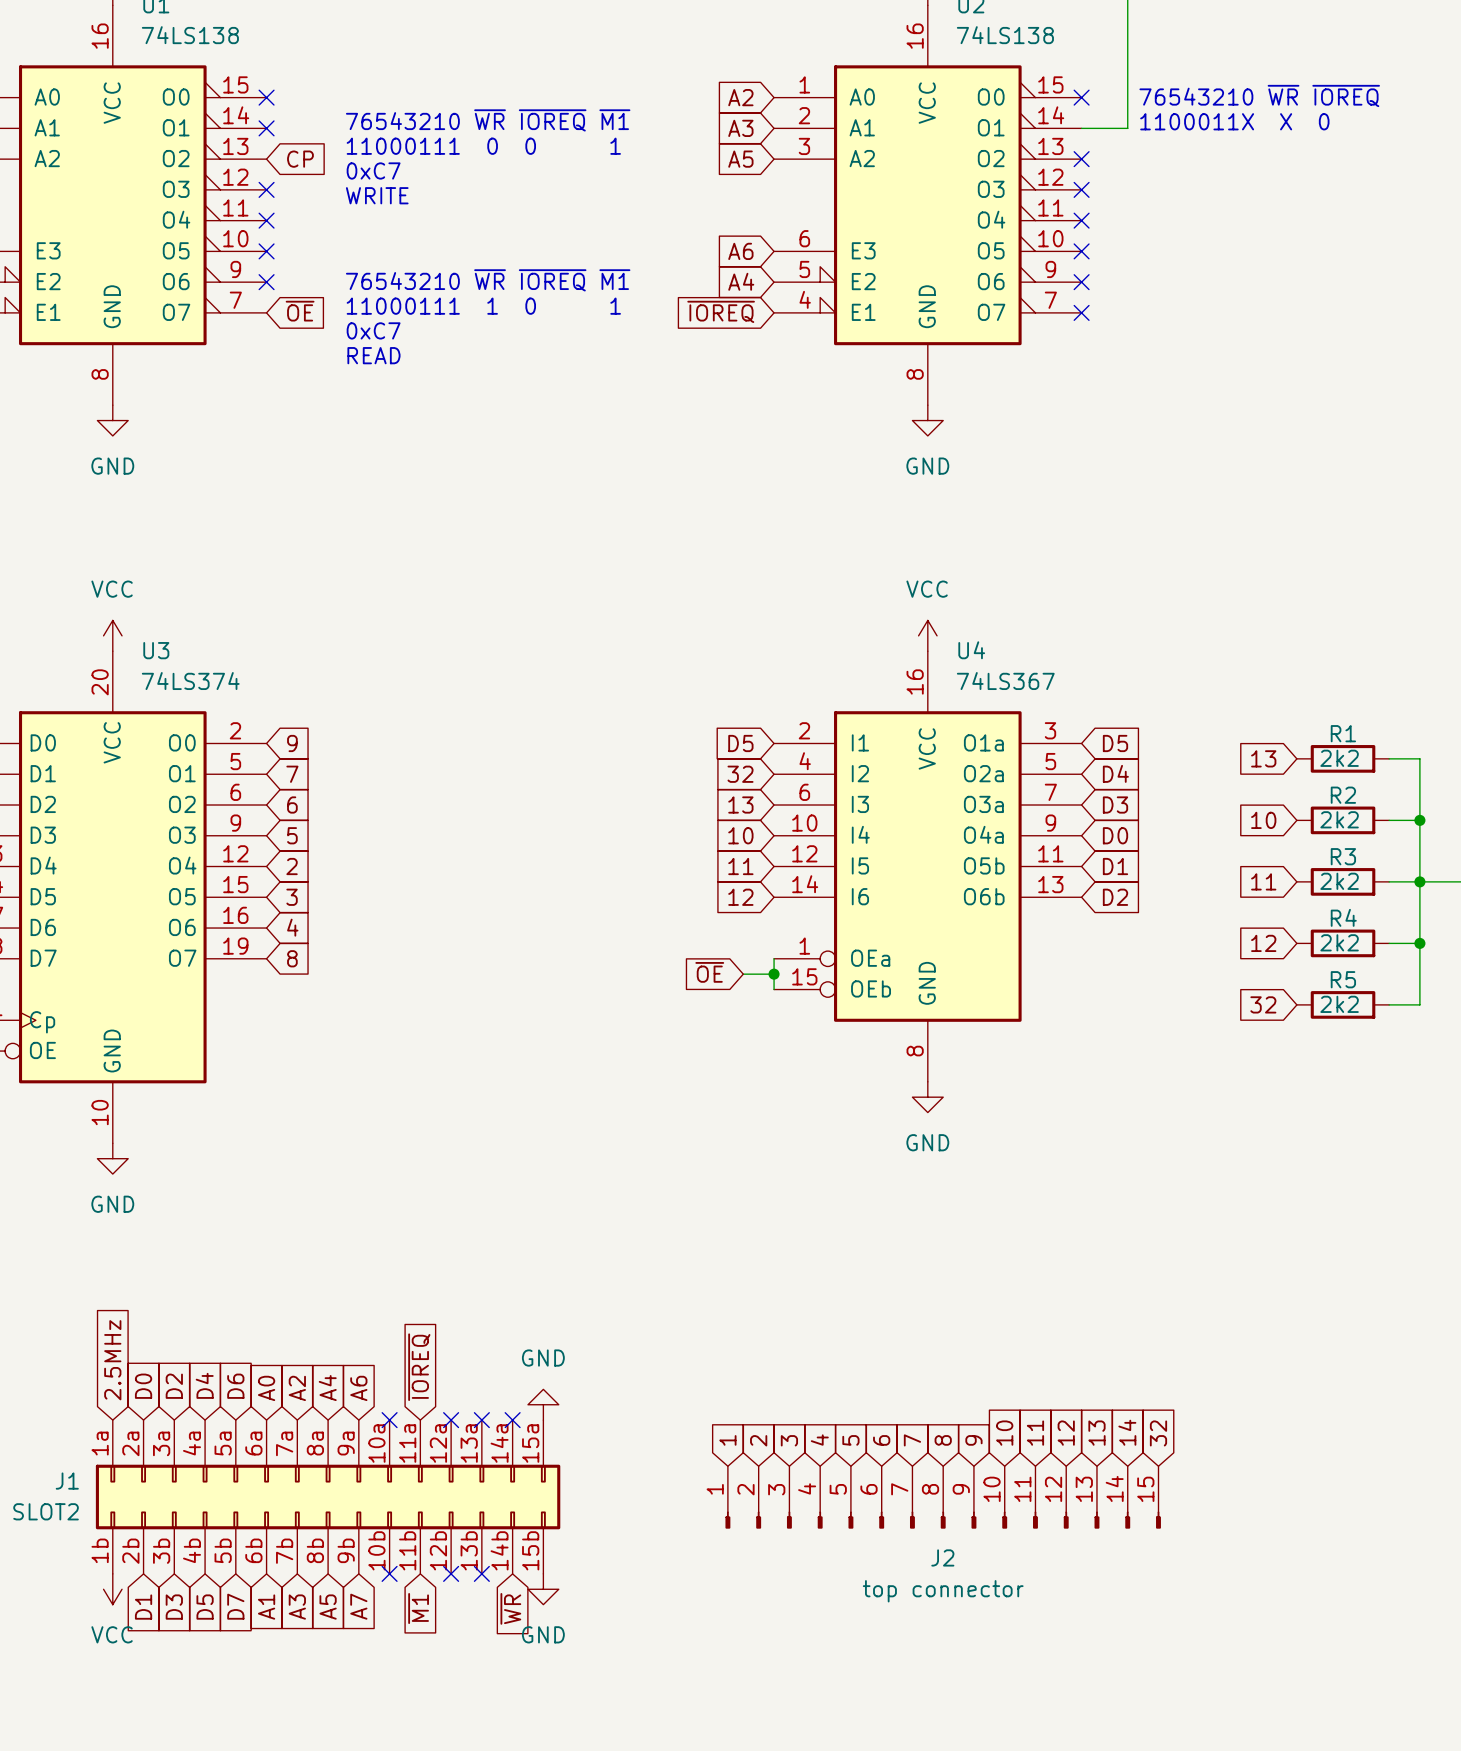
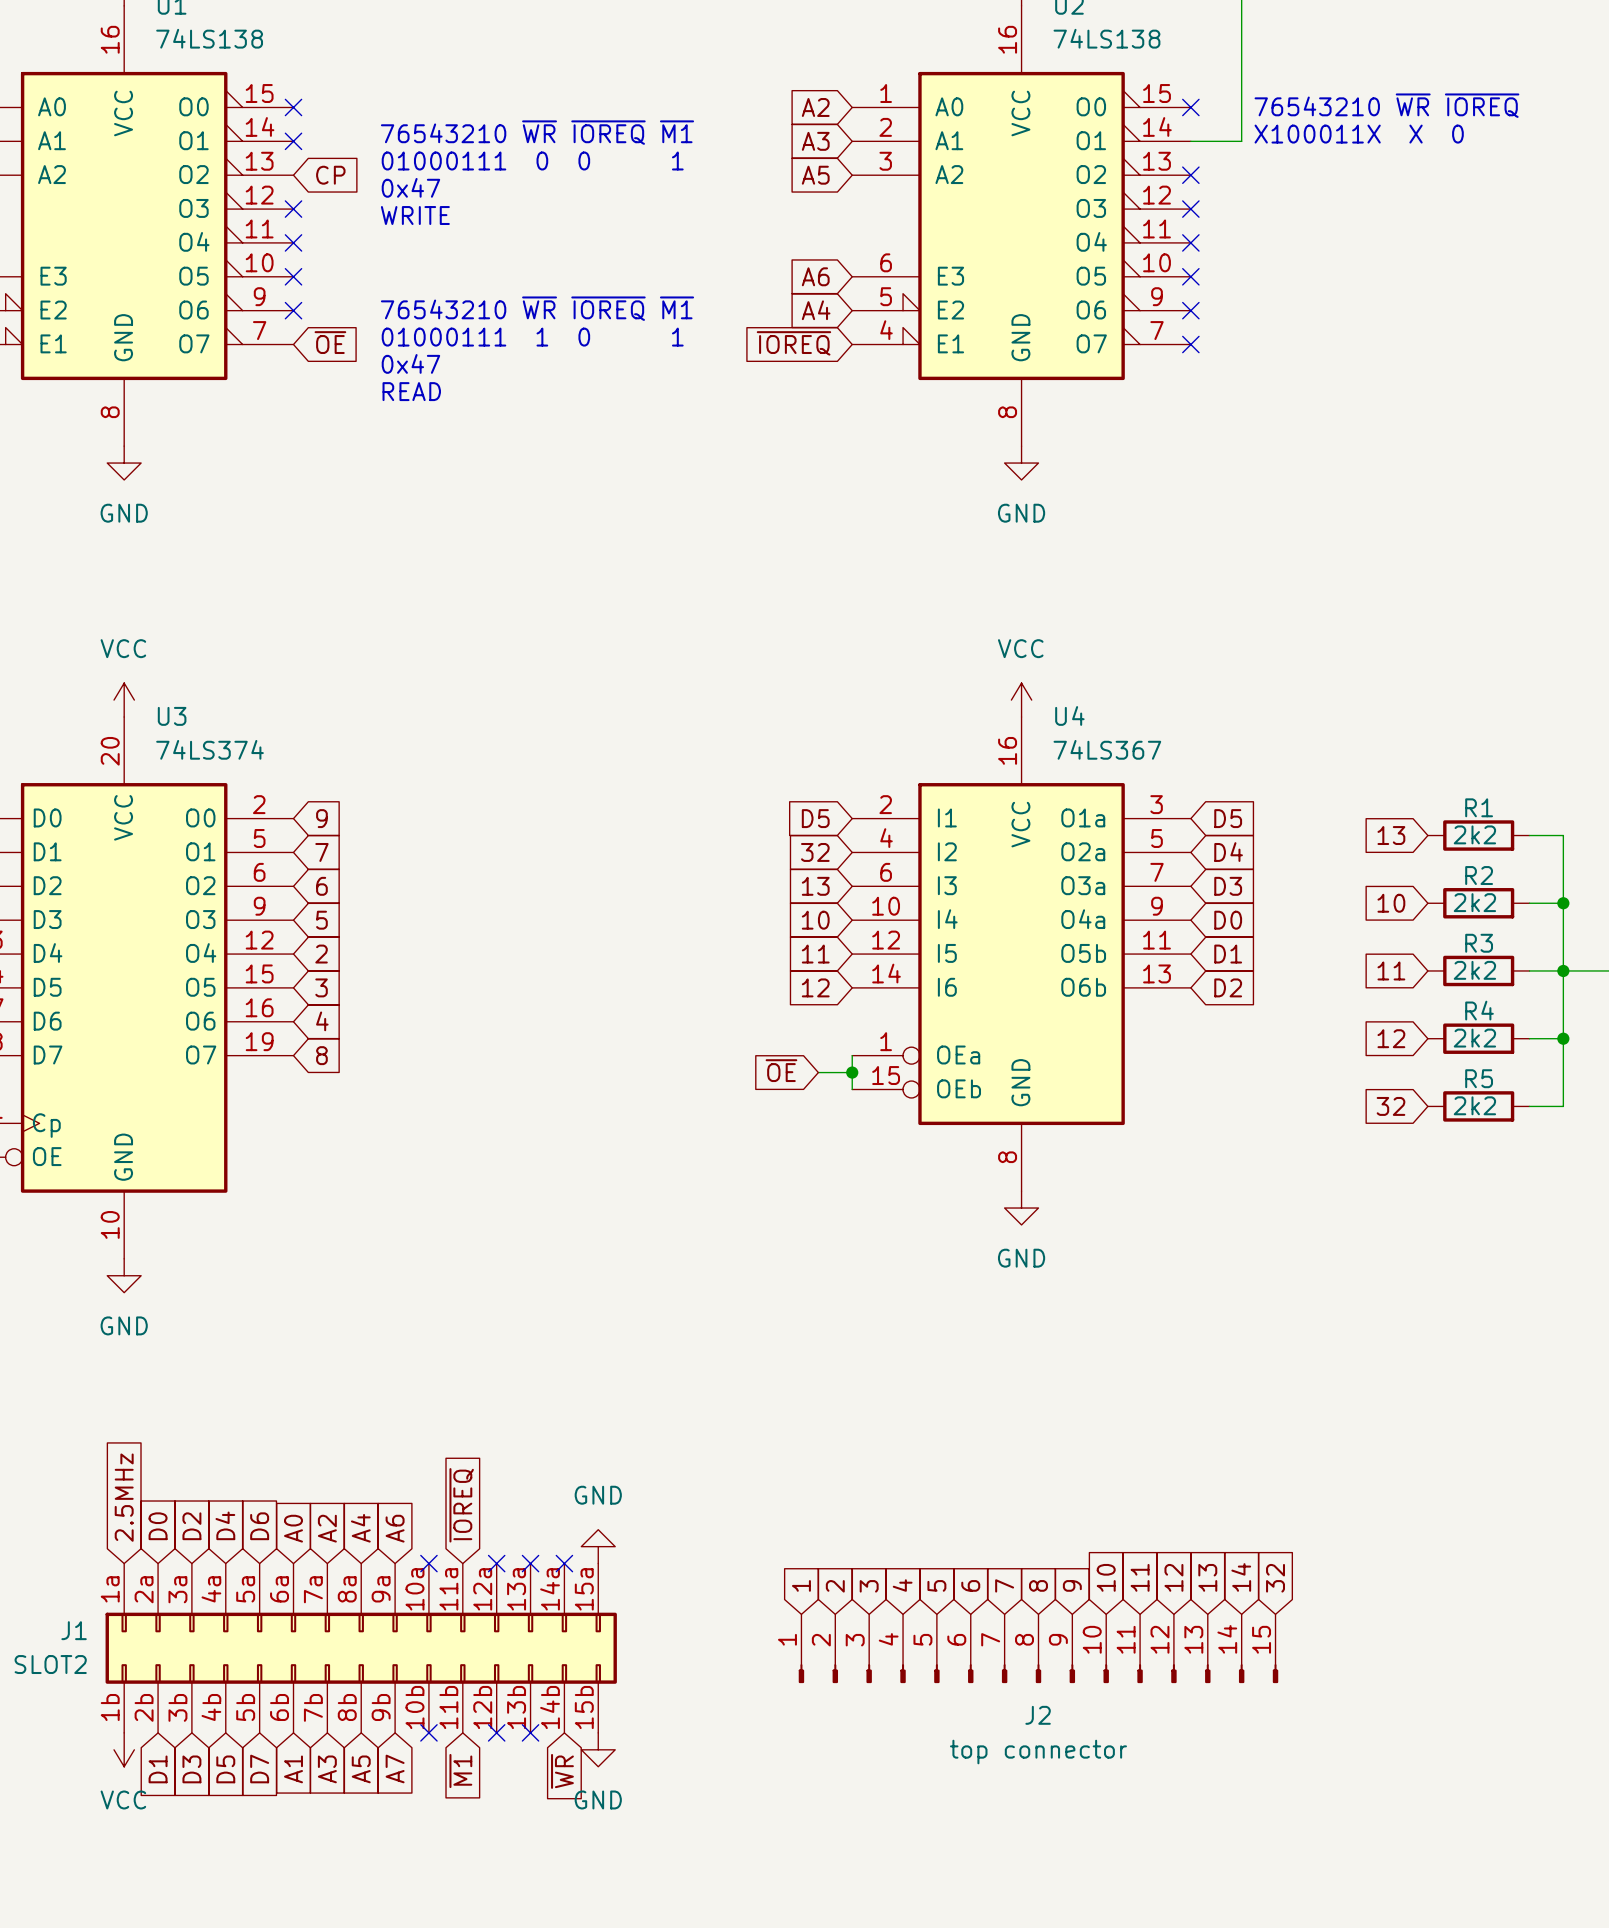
text: 1100011X X 0 (1234, 121) -> X100011X X 0 (1359, 134)
text: 11000111 0 0 1 (483, 146) -> 01000111 0 0 1 (532, 160)
text: 0xC7 (373, 170) -> 0x47 (410, 187)
text: 11000111 1 0 1 (483, 306) -> 01000111 1 0 1 (532, 337)
text: 0xC7 (373, 330) -> 0x47 (410, 363)

